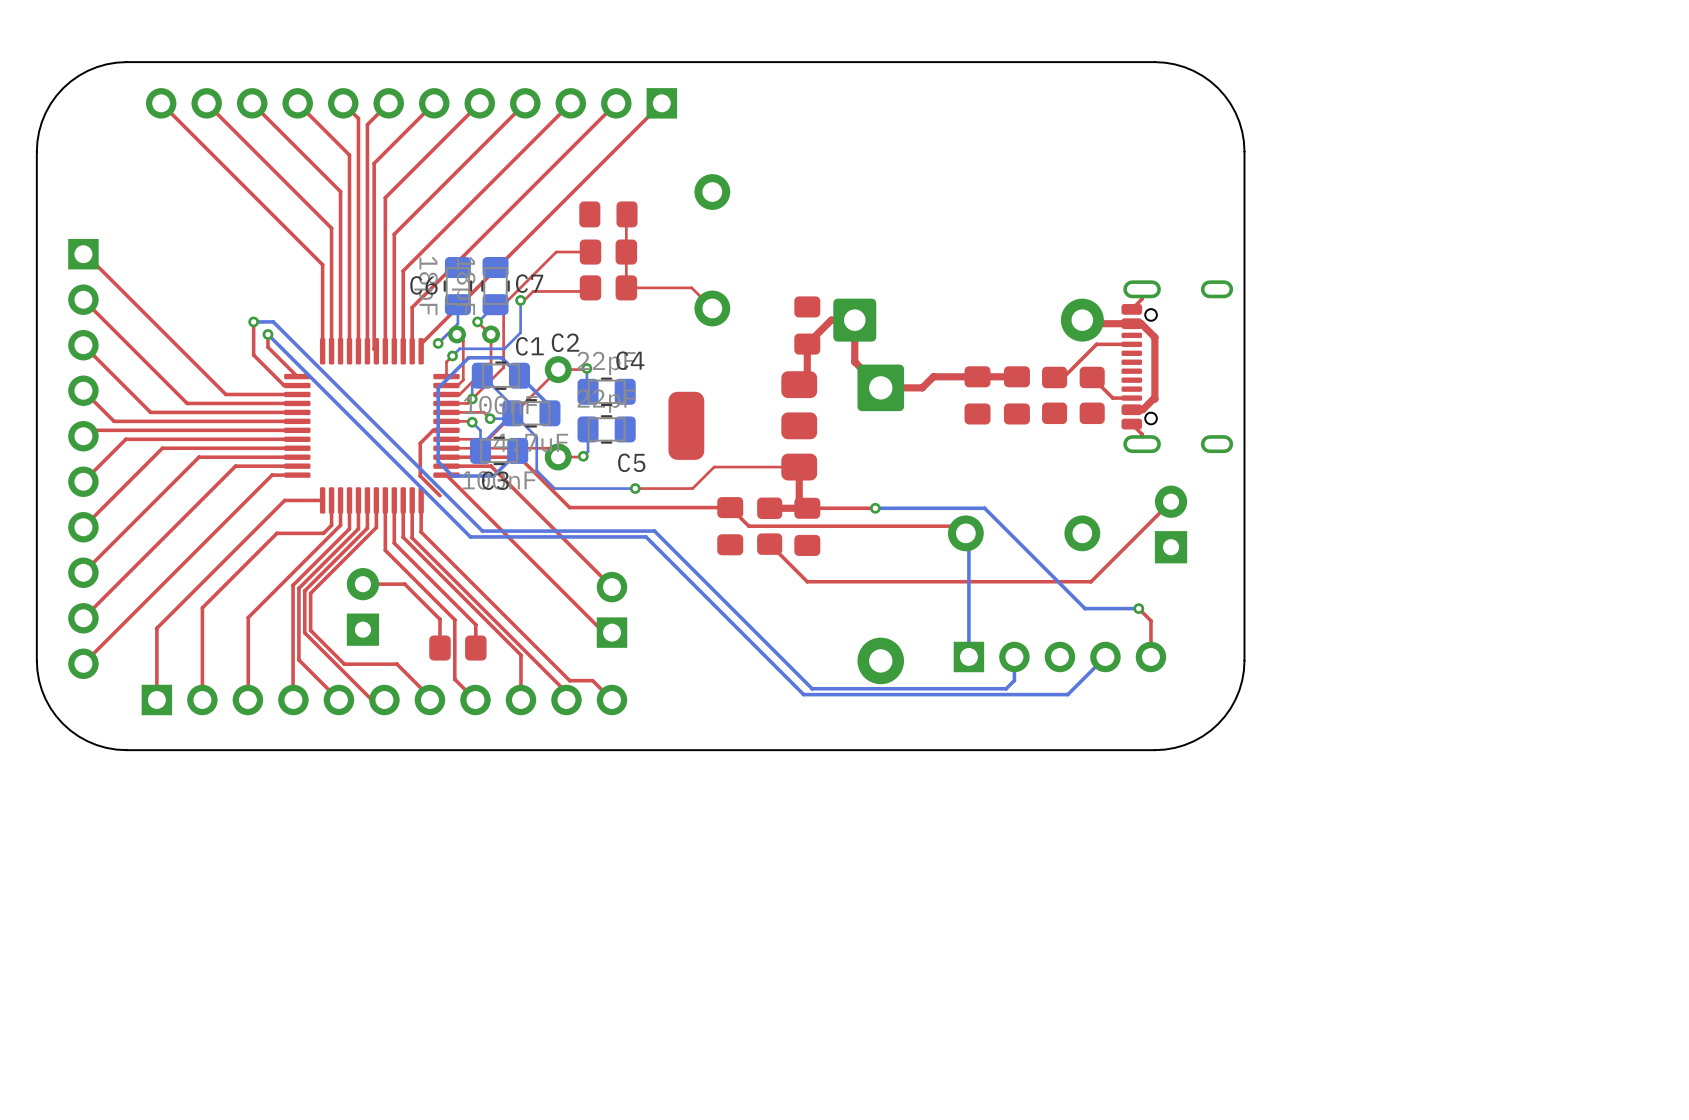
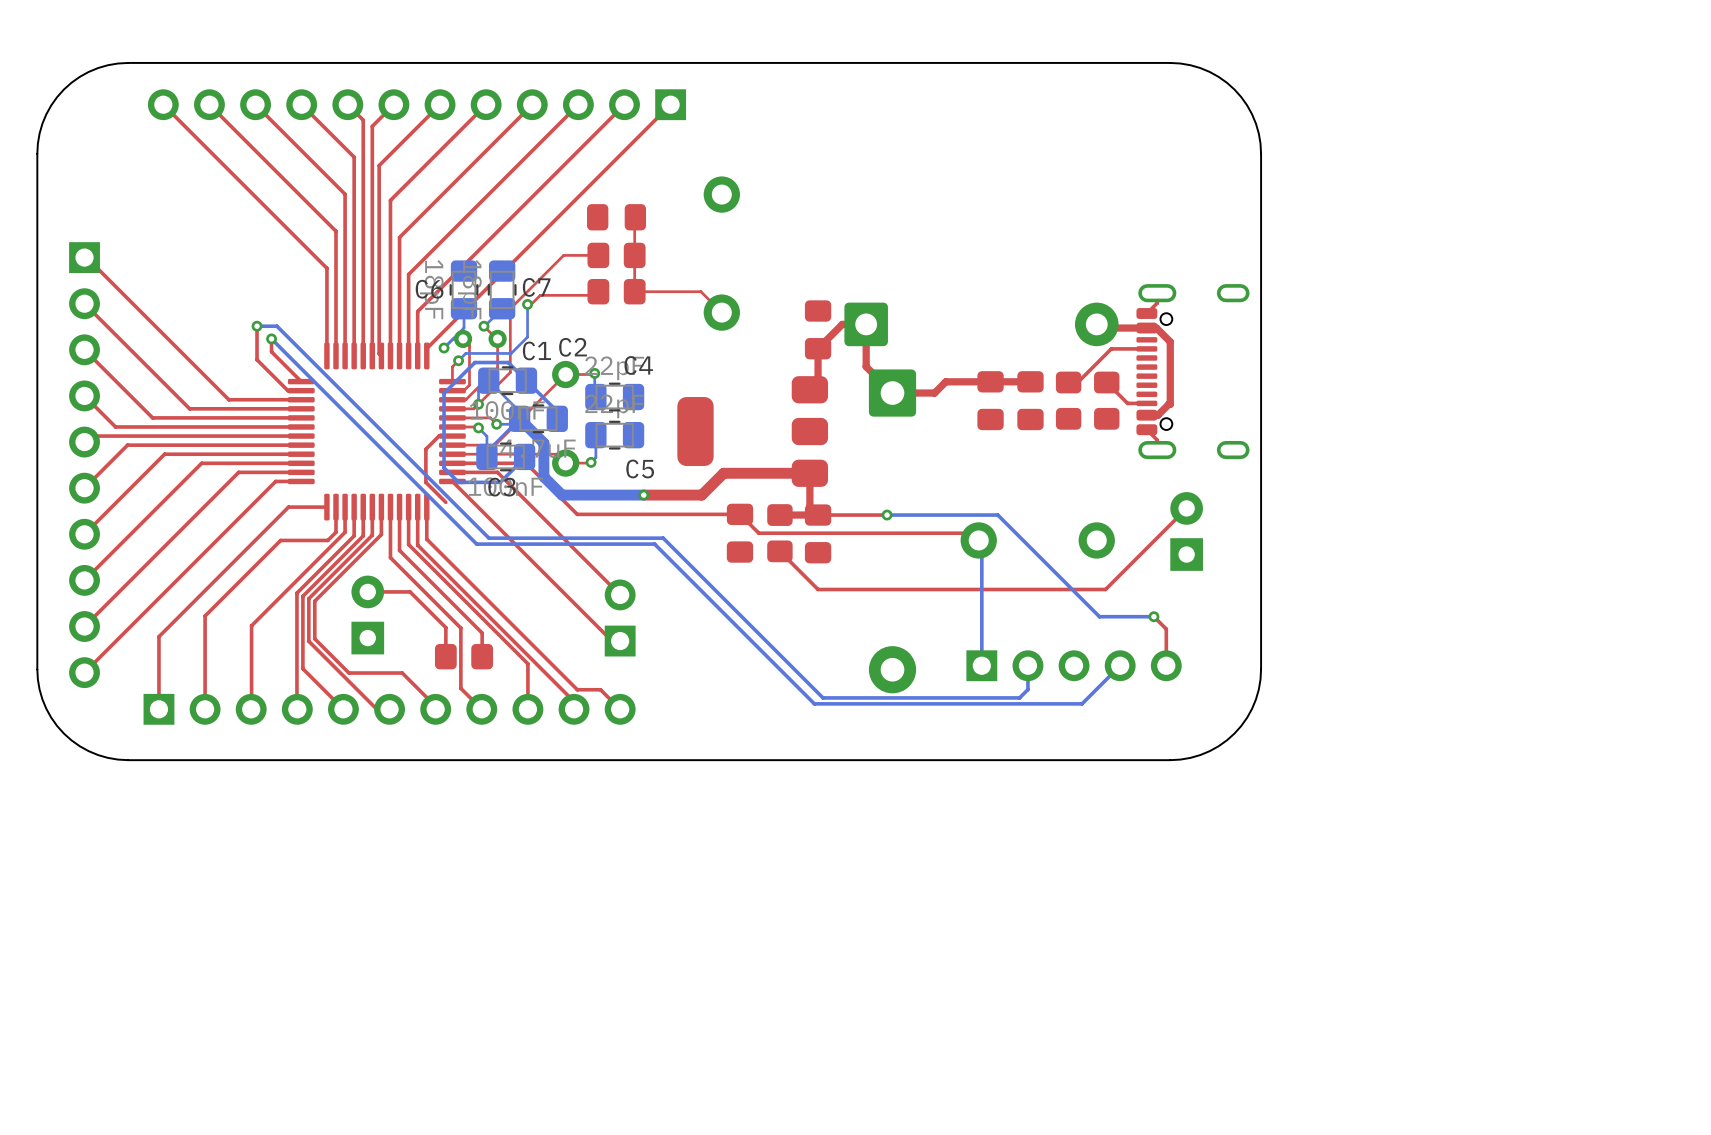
bottom track width: thin (512, 413) (536, 437) (536, 470) (554, 488) (635, 488) -> thick (519, 418) (543, 443) (543, 476) (562, 495) (643, 495)
top track width: thin (799, 467) (714, 467) (692, 488) (635, 488) -> thick (809, 473) (723, 473) (701, 495) (643, 495)

